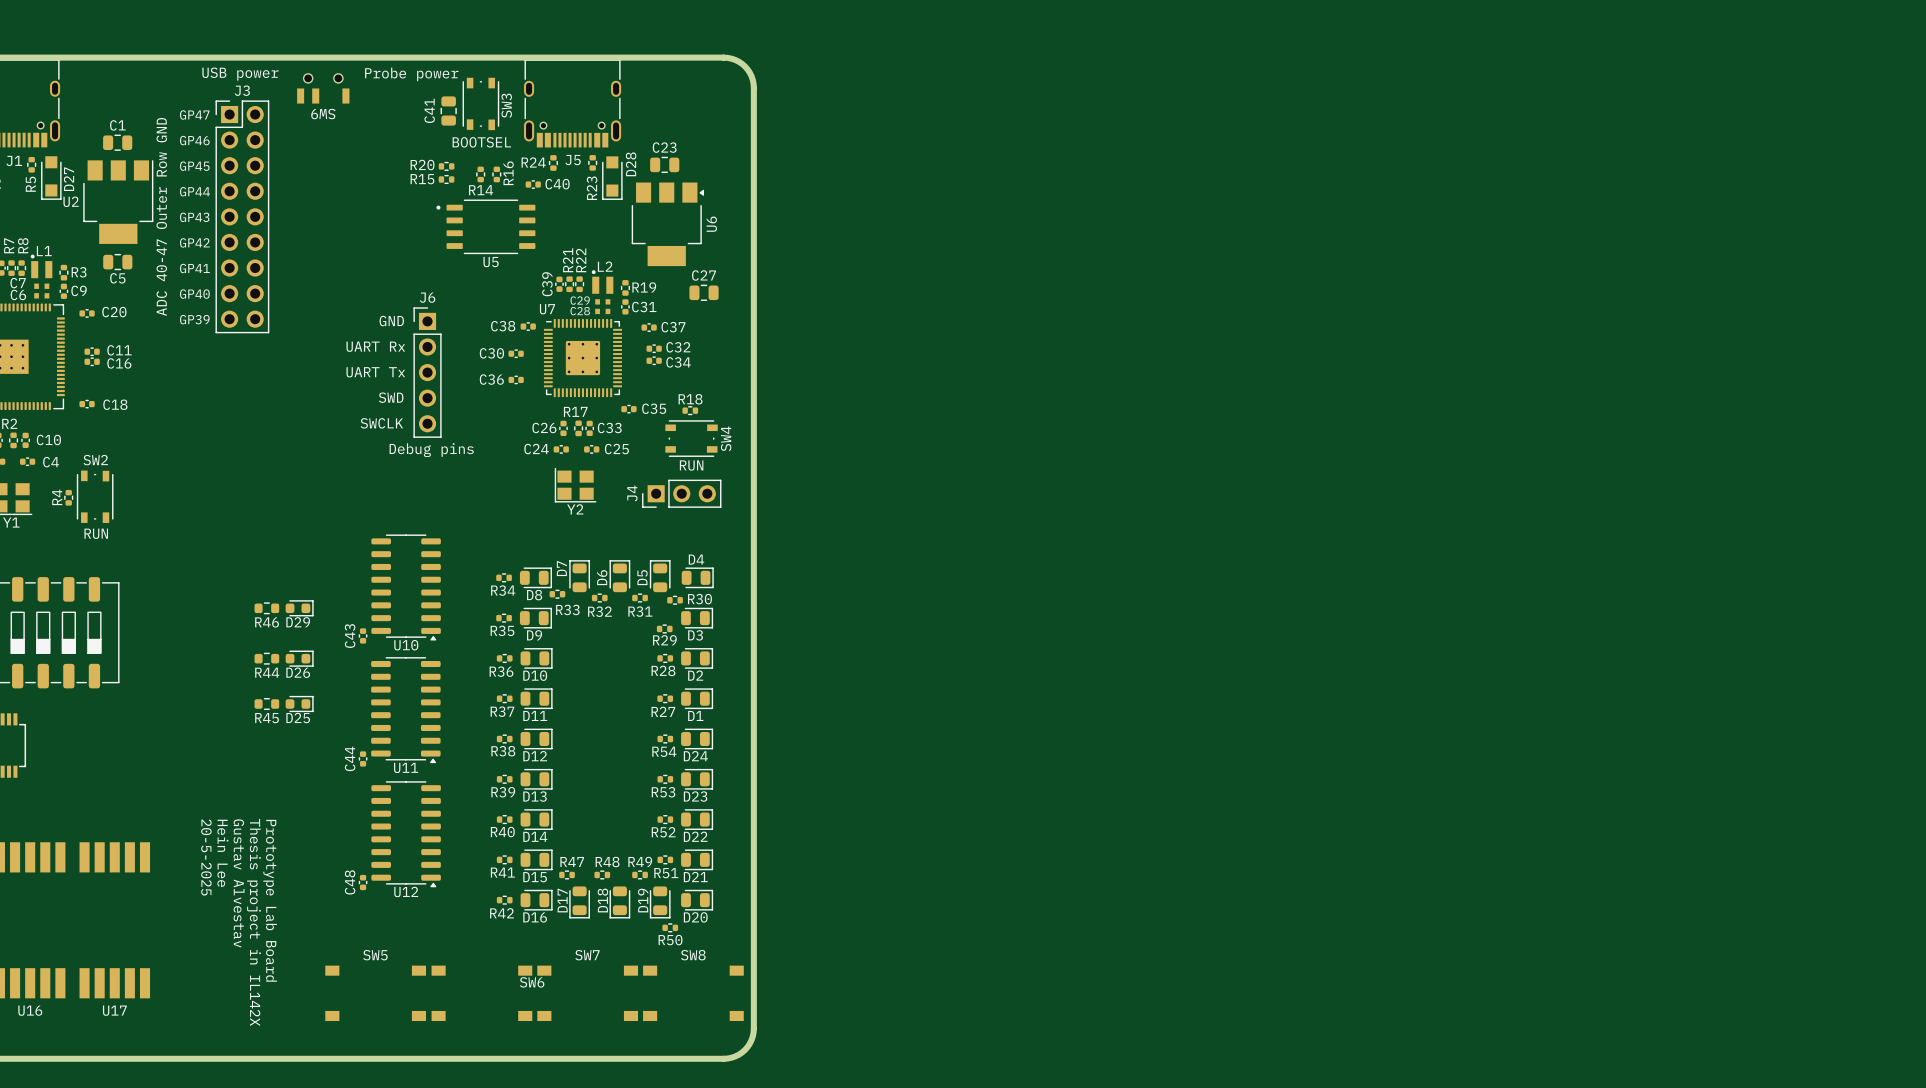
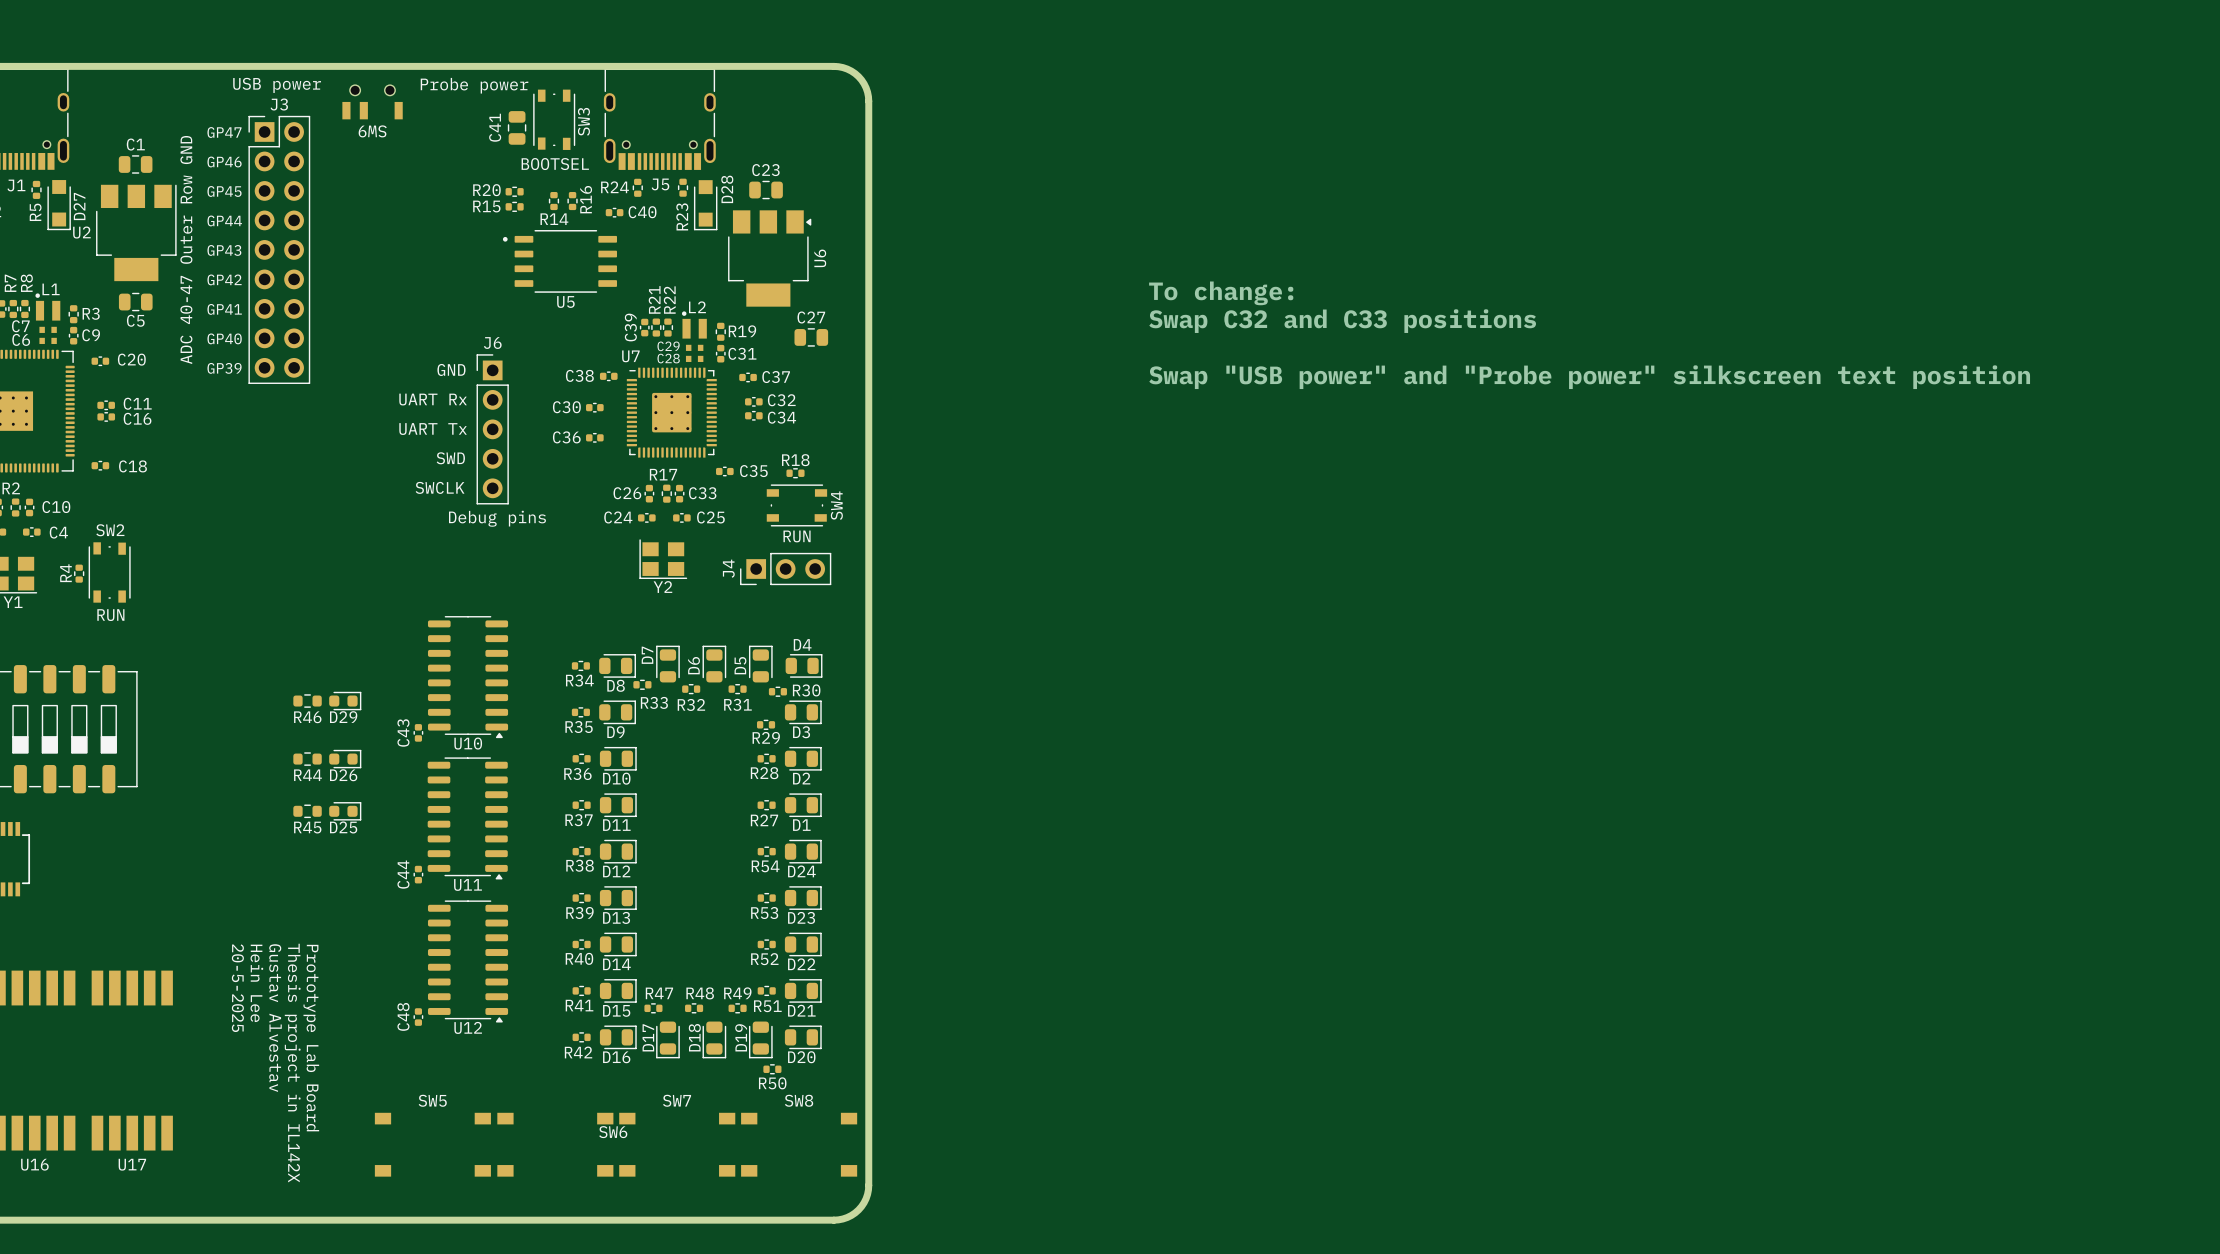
text: none -> To change: (1221, 293)
text: none -> Swap C32 and C33 positions (1342, 321)
text: none -> Swap "USB power" and "Probe power" silkscreen text position (1589, 377)

